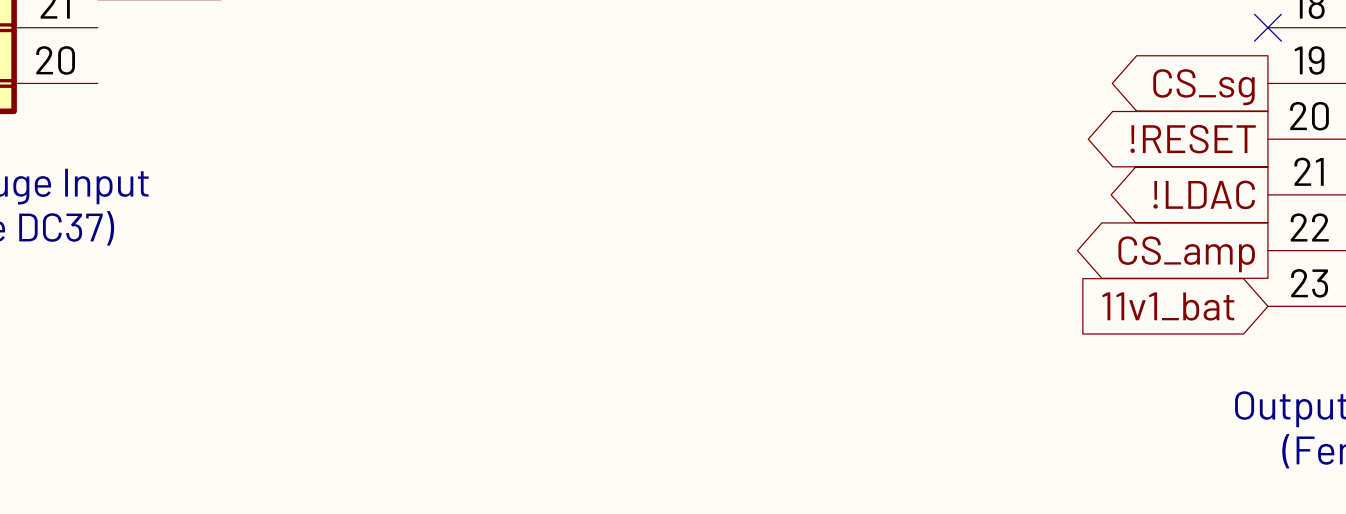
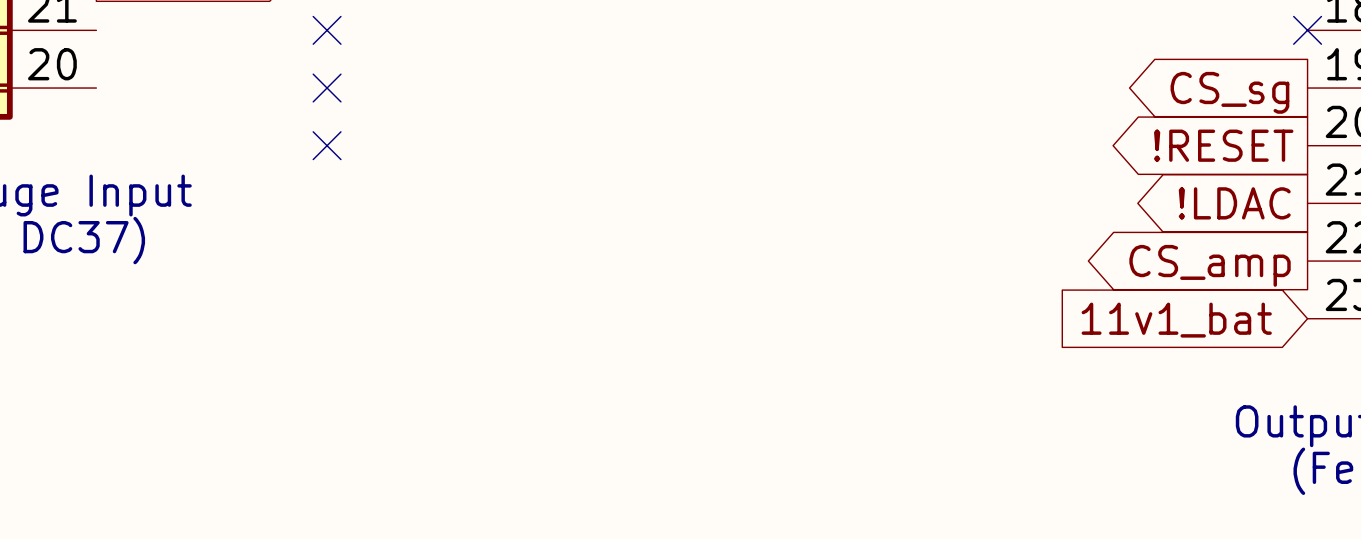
no-connect mark: none -> (327, 30)
no-connect mark: none -> (327, 88)
no-connect mark: none -> (327, 145)

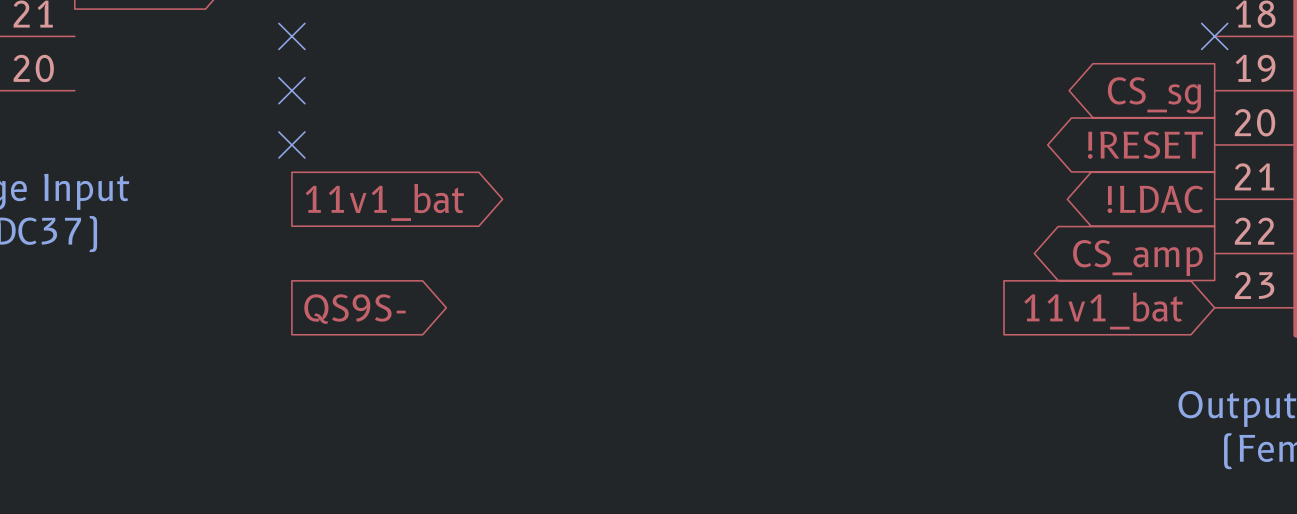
global label: none -> 11v1_bat (384, 202)
global label: none -> QS9S- (354, 309)

